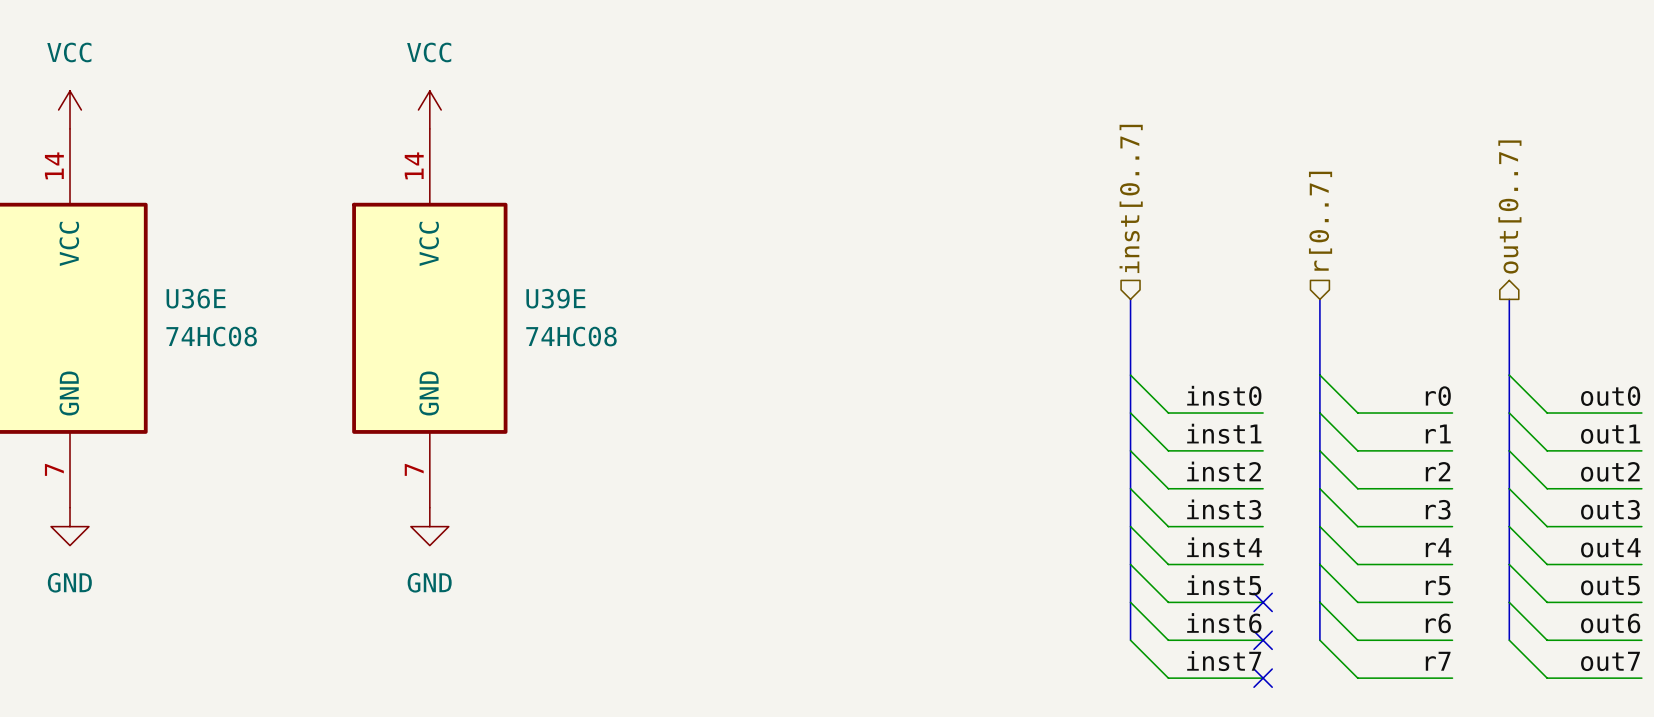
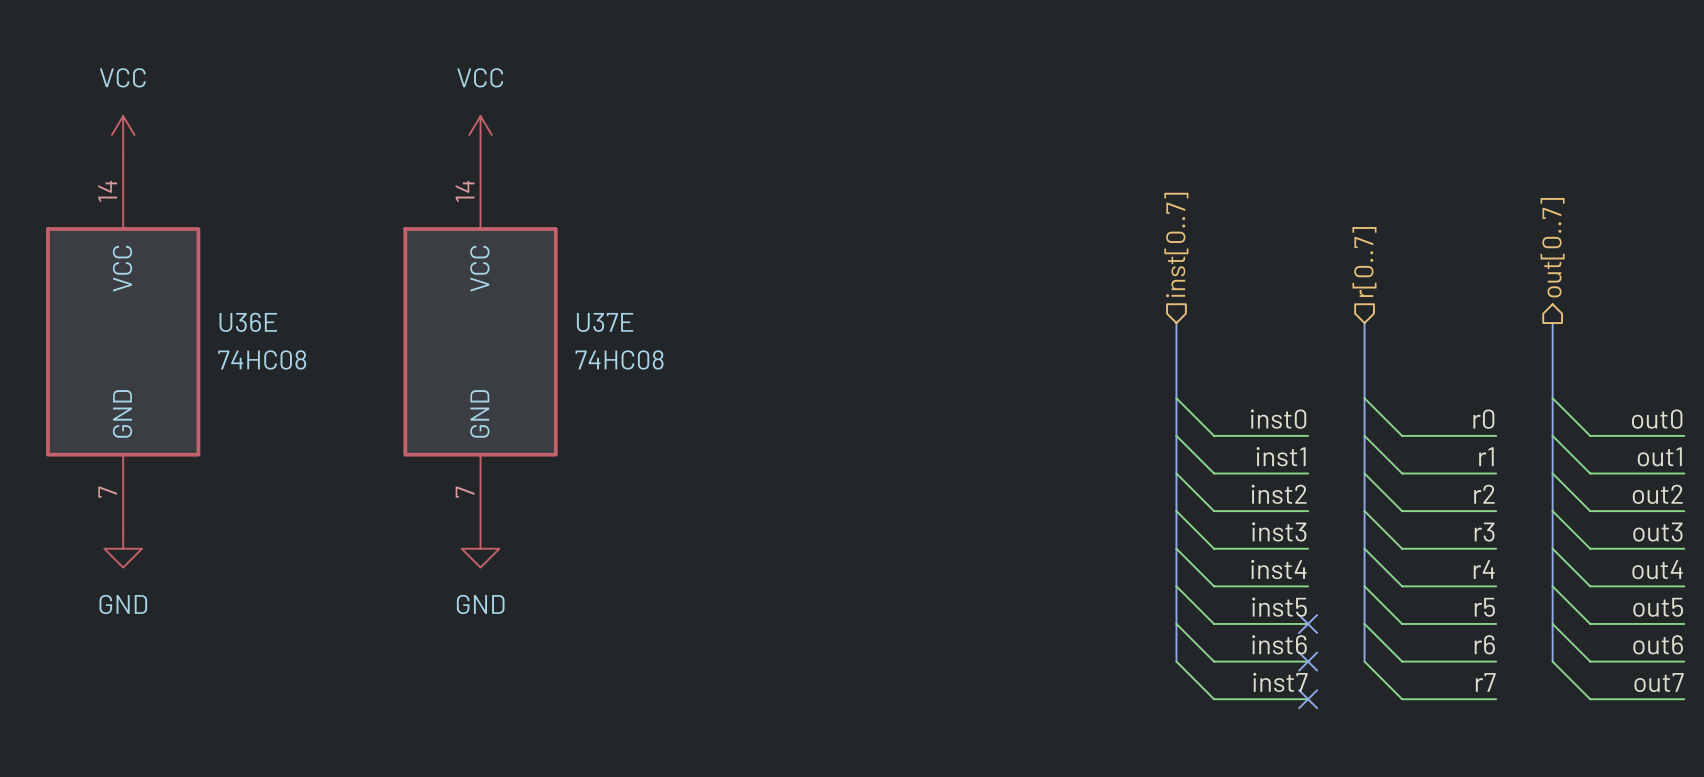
U39E name: U39E (555, 298) -> U37E (605, 322)

